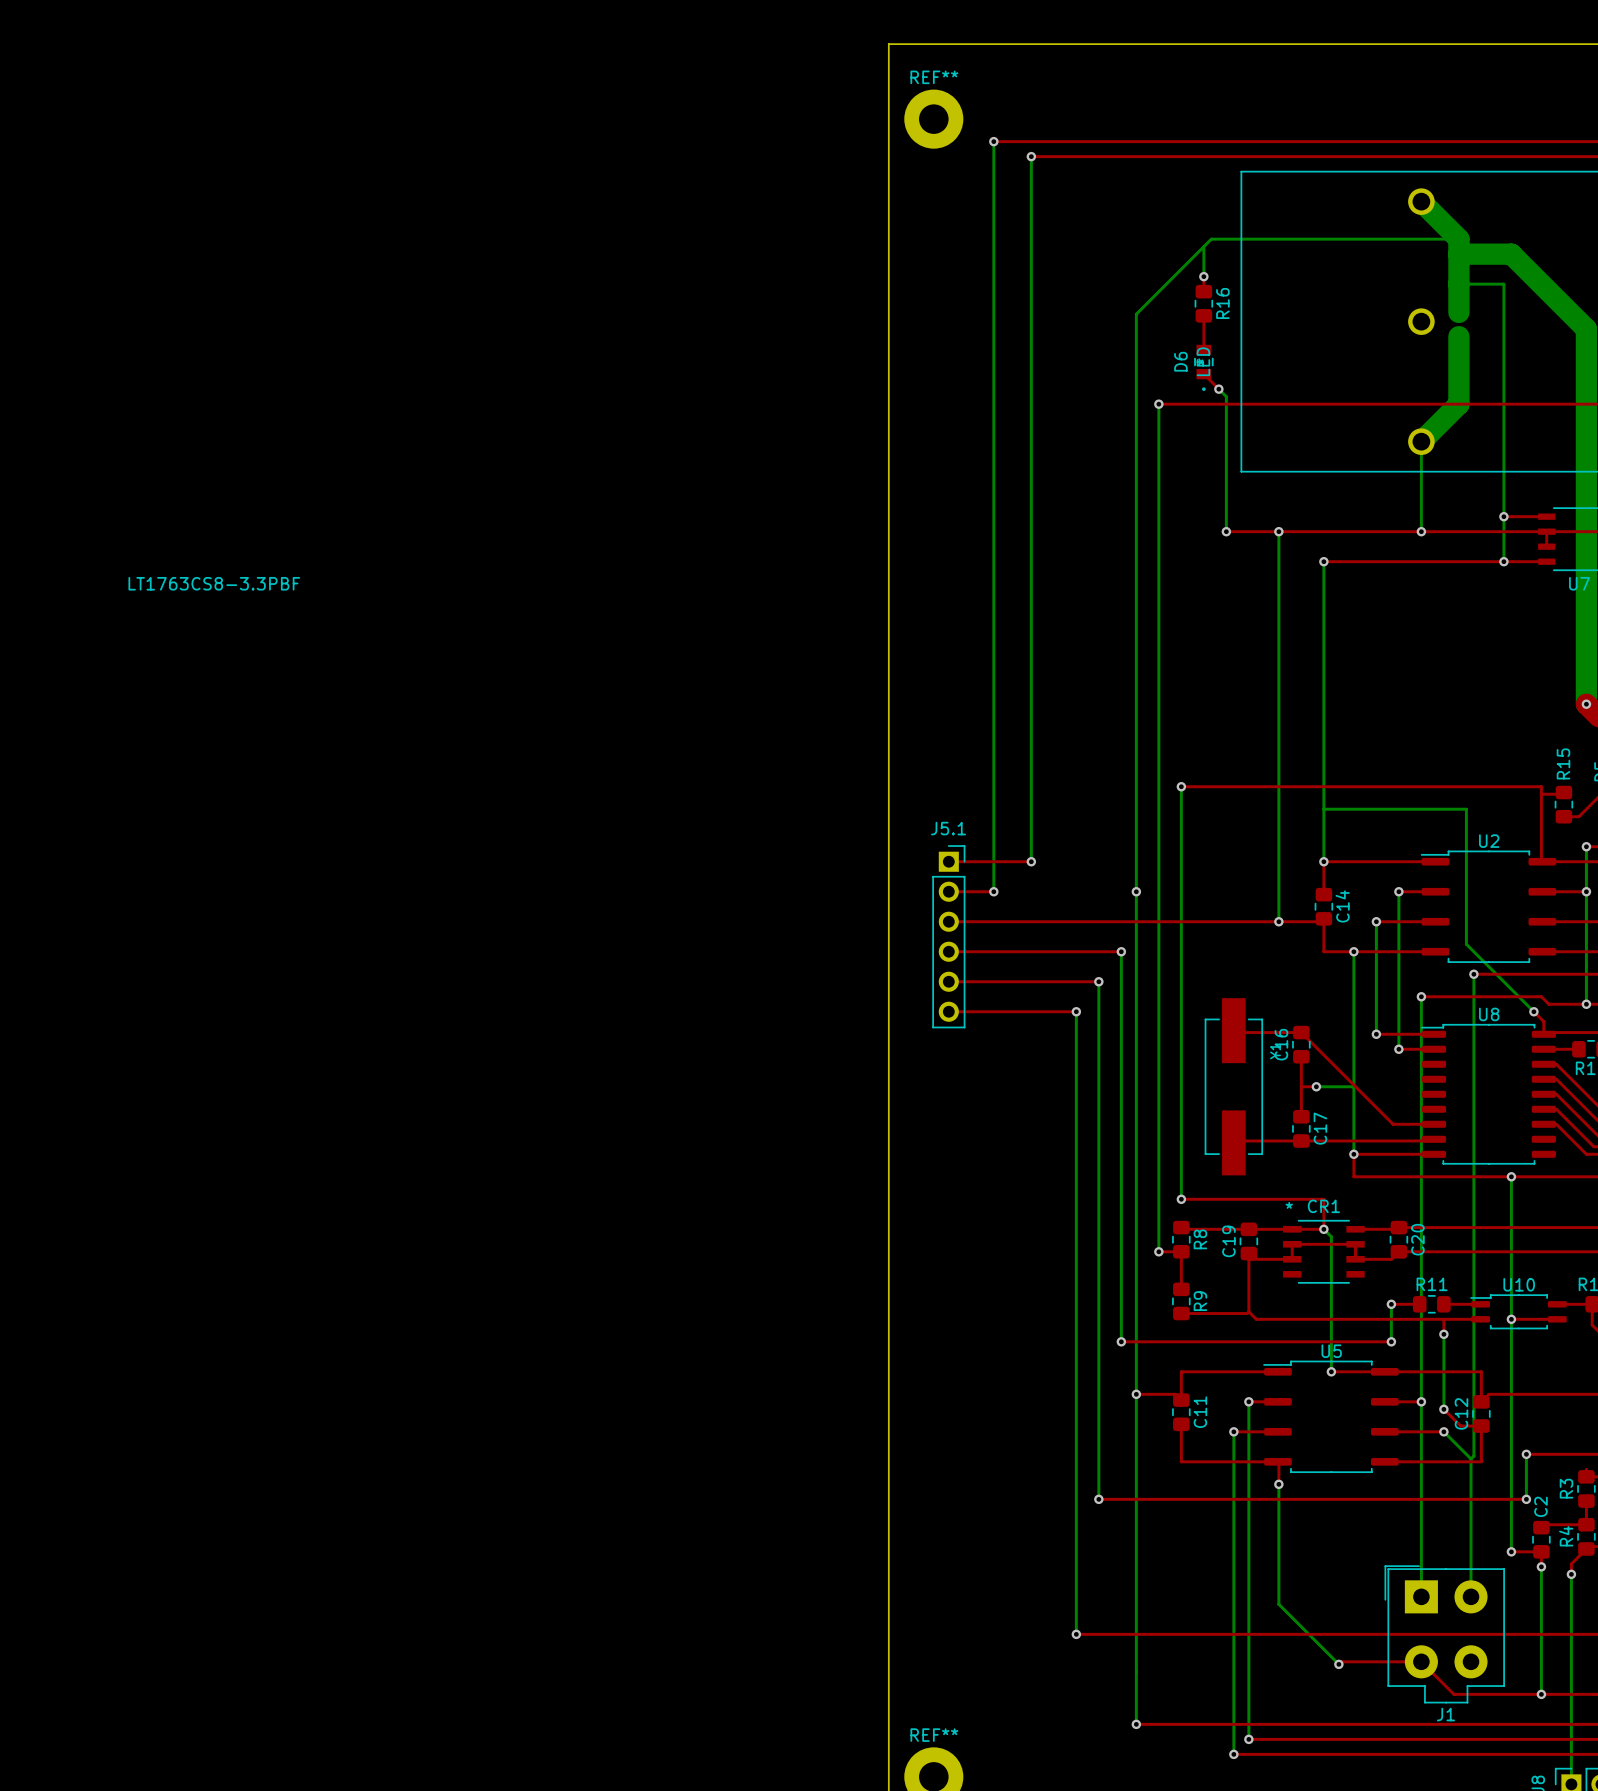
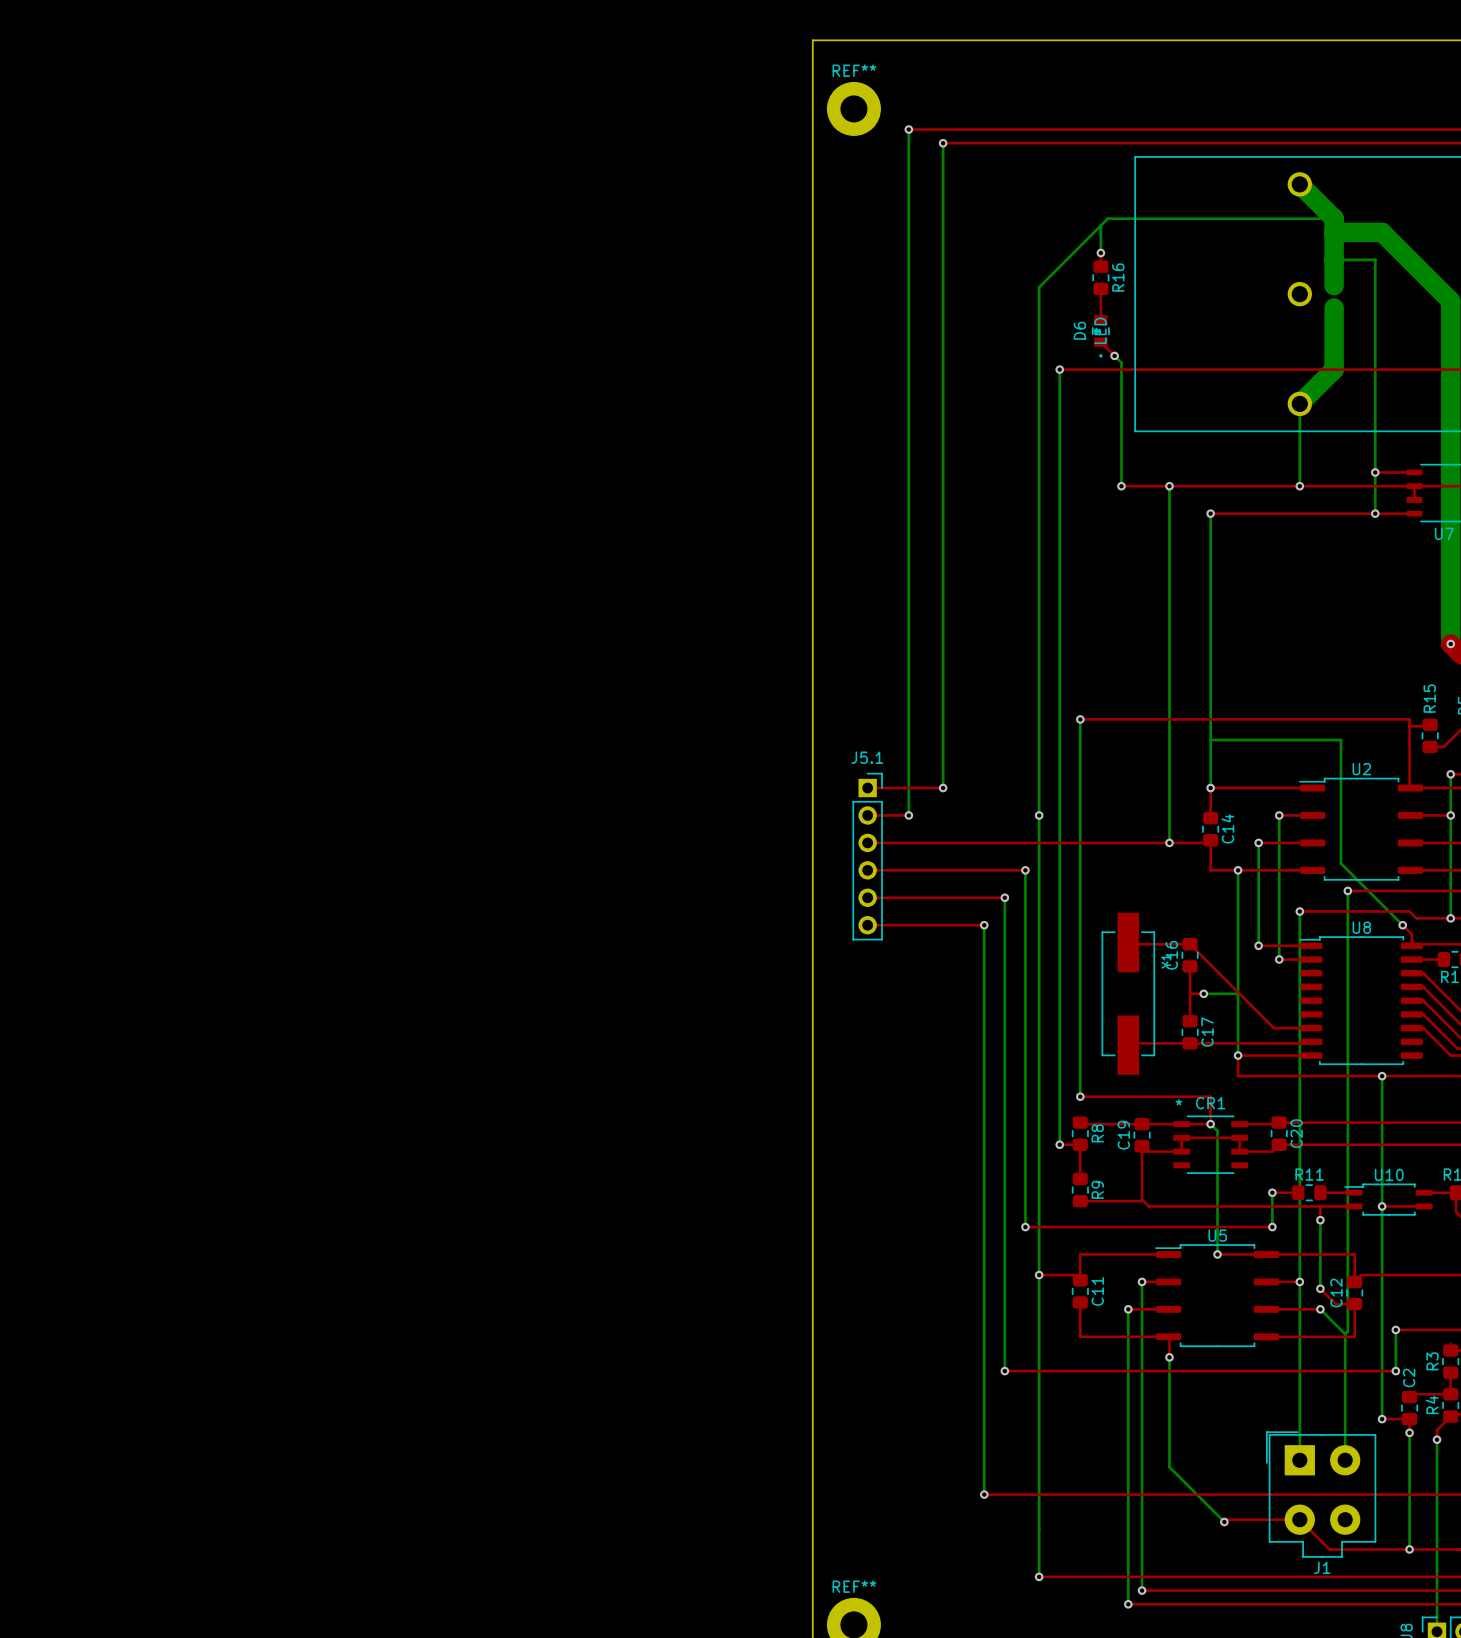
U7 value: LT1763CS8-3.3PBF (214, 583) -> none

